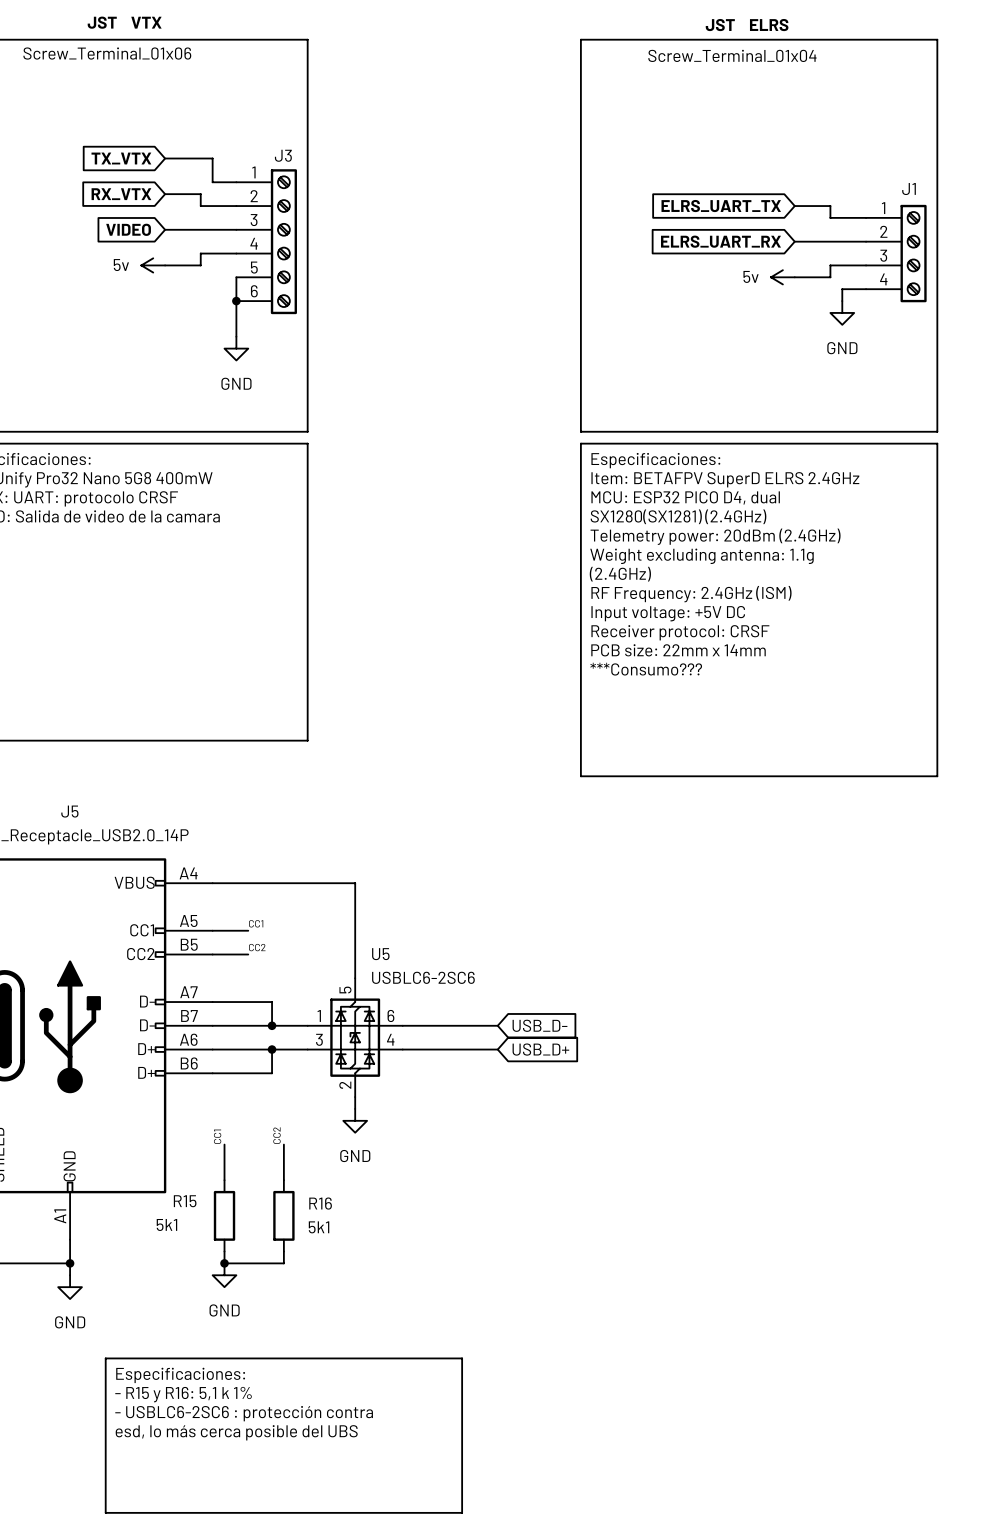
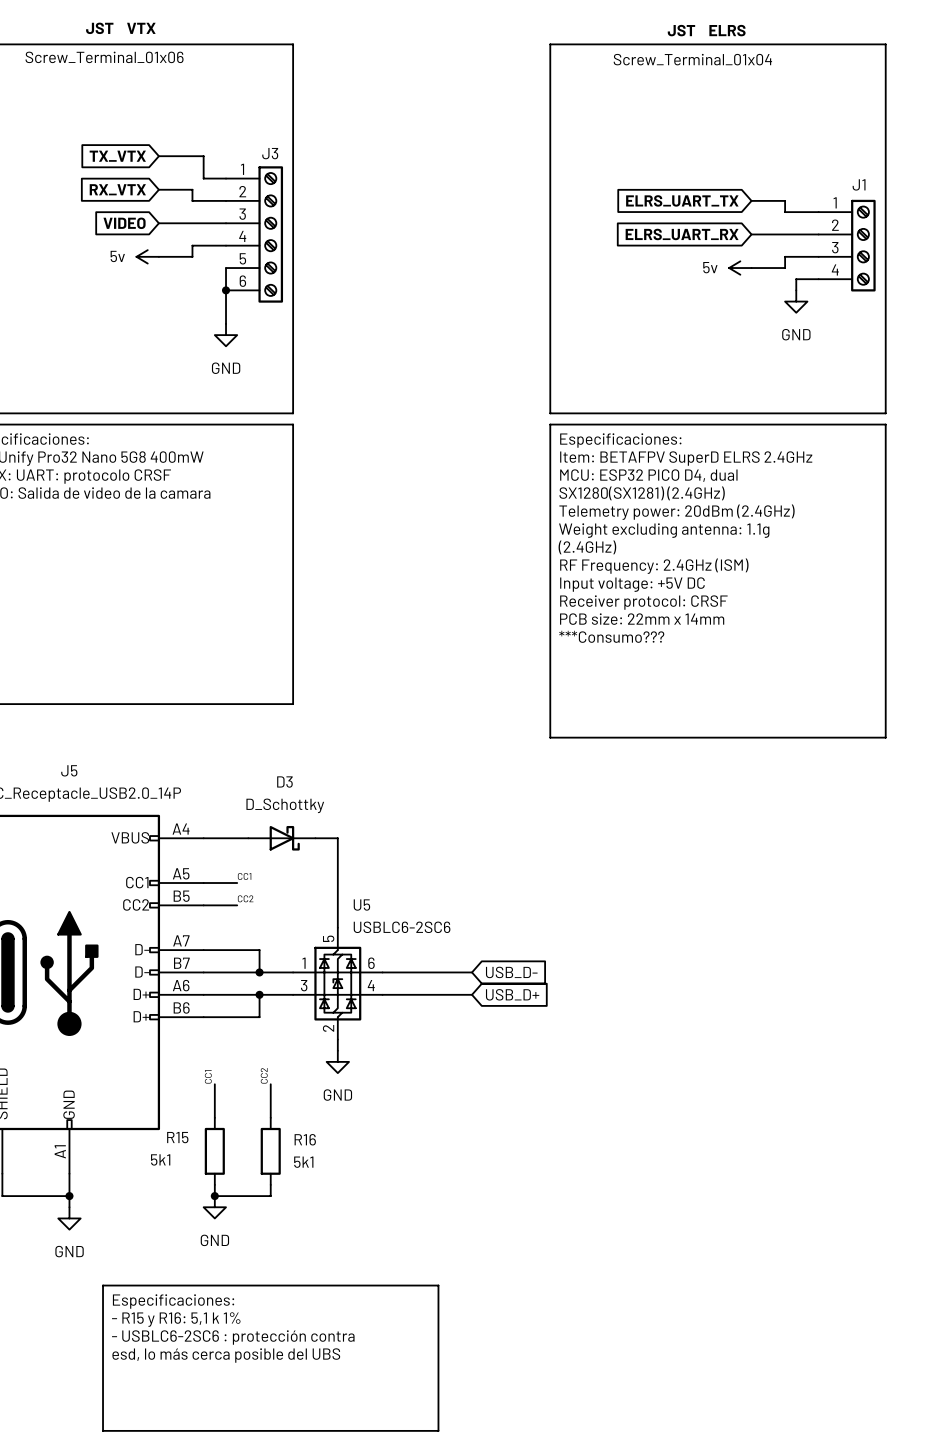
D3: none -> D_Schottky (281, 838)

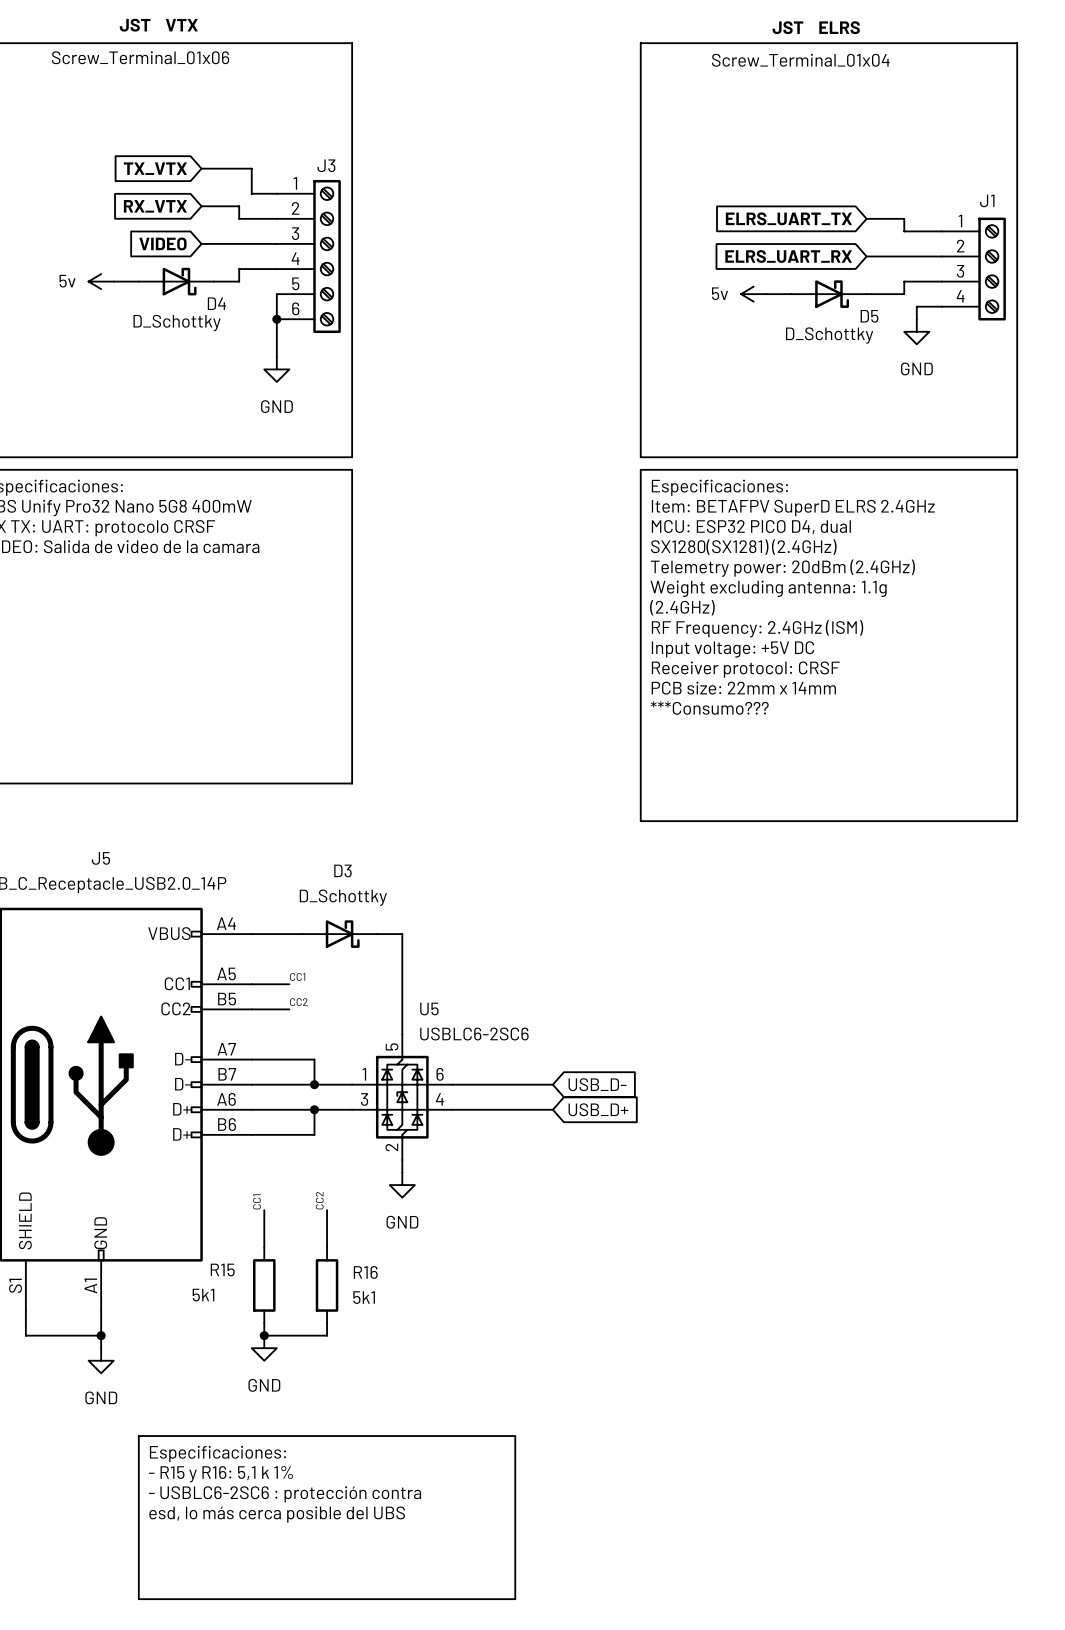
wire: none -> (113, 281) (138, 281)
D4: none -> D_Schottky (176, 281)
power symbol position: 5v (147, 256) -> 5v (101, 281)
wire: none -> (766, 294) (791, 294)
D5: none -> D_Schottky (828, 294)
power symbol position: 5v (740, 268) -> 5v (753, 294)

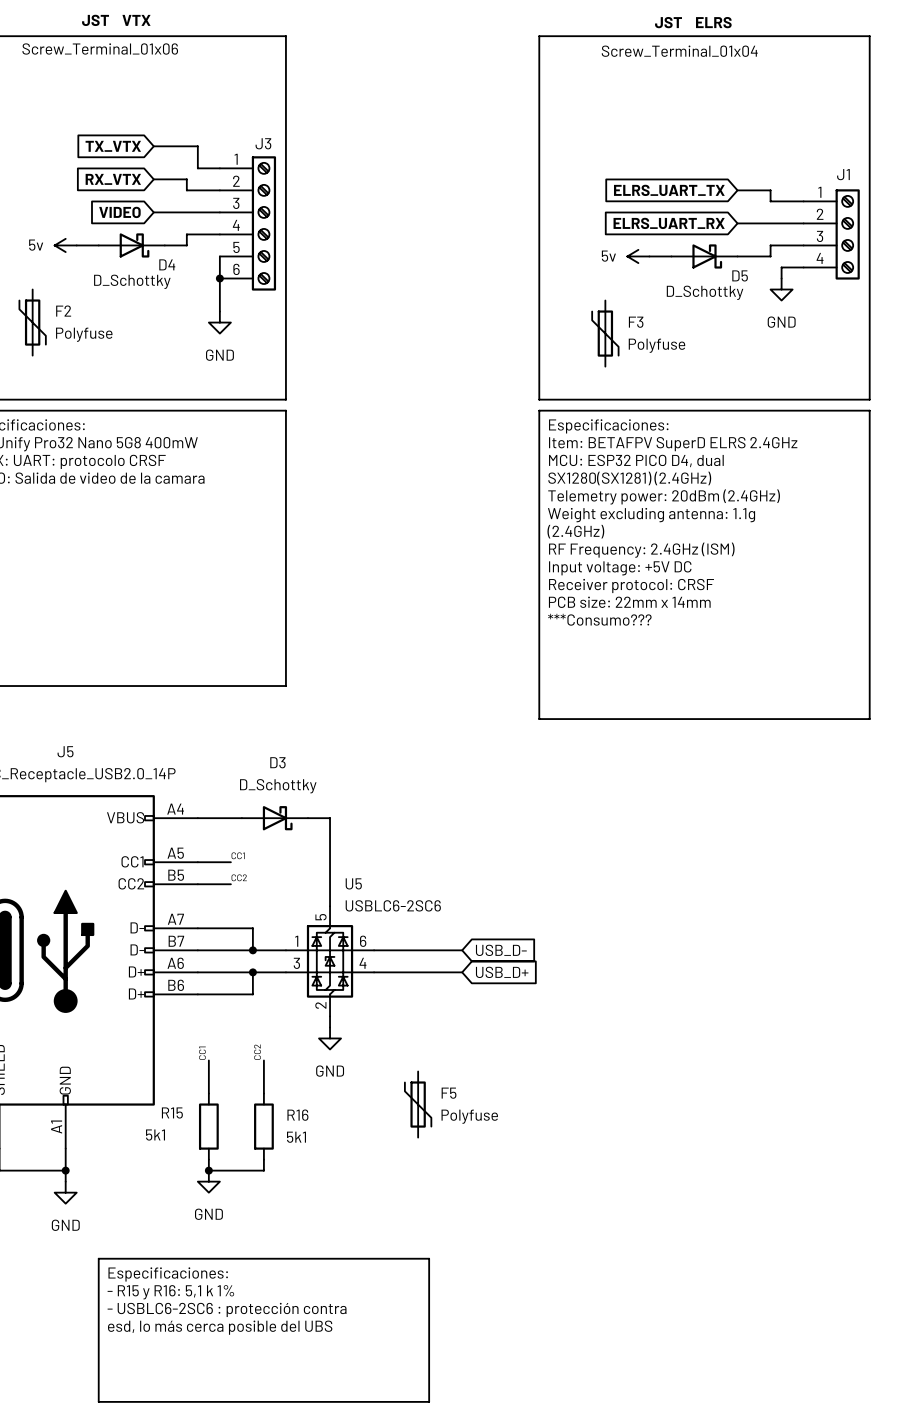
F2: none -> Polyfuse (32, 322)
F3: none -> Polyfuse (605, 333)
F5: none -> Polyfuse (418, 1104)

